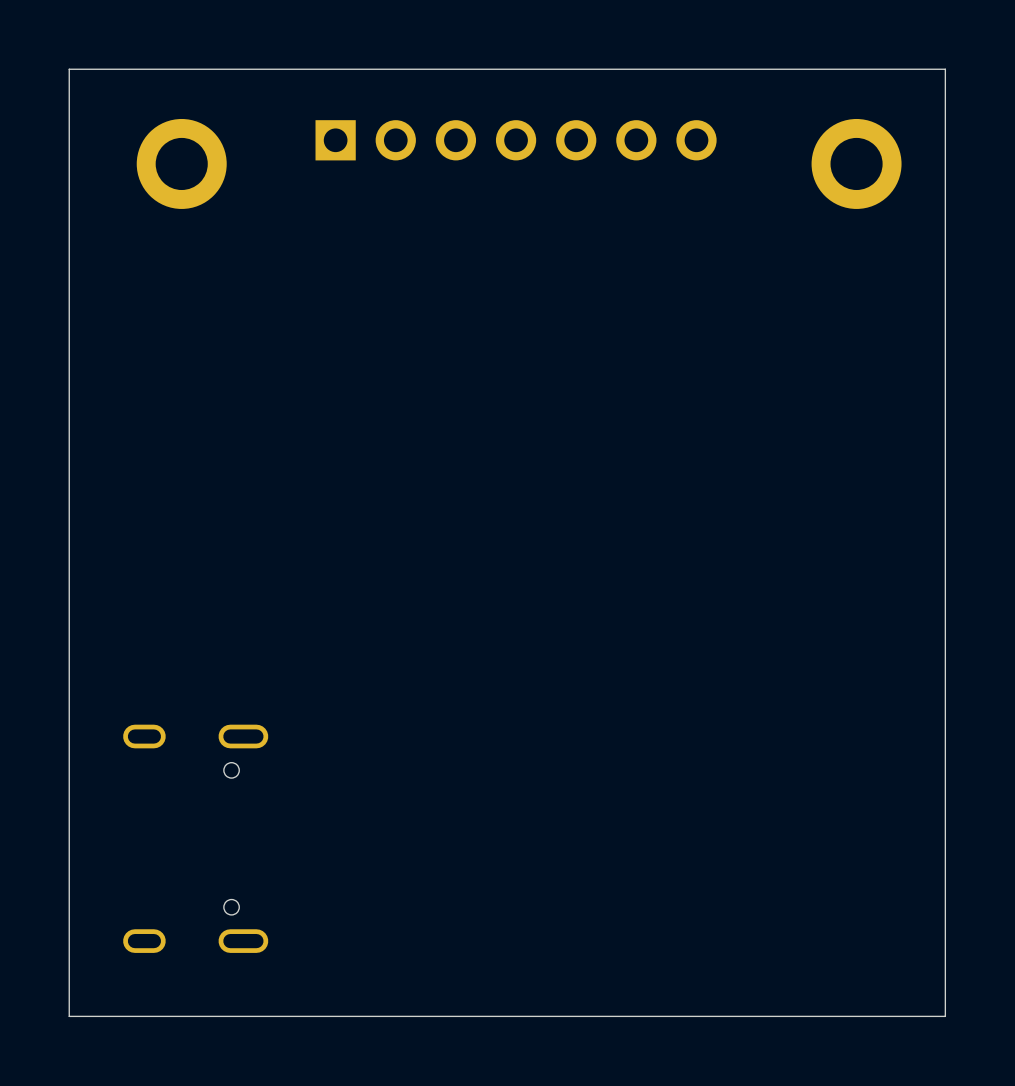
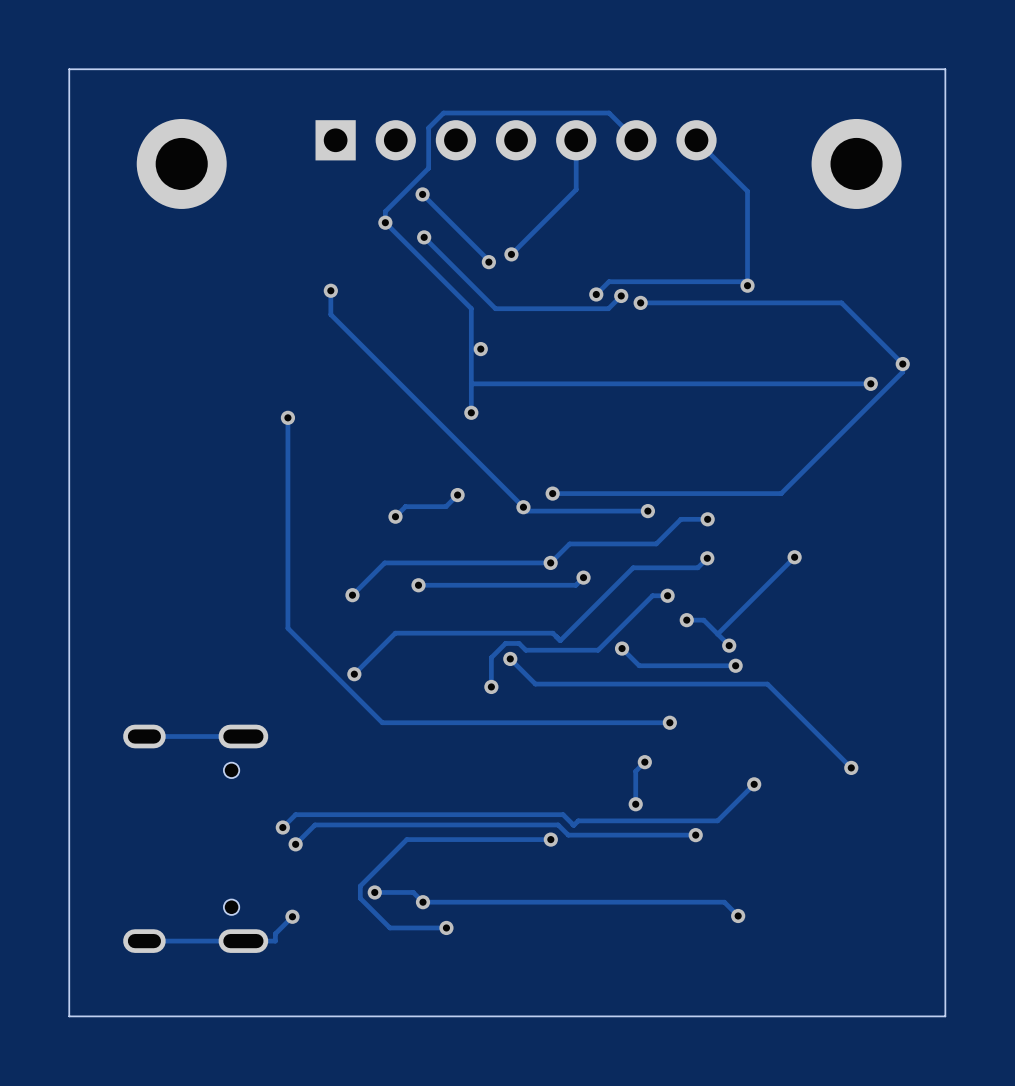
track: none -> (576, 140) (576, 189) (511, 254)
track: none -> (636, 140) (609, 113) (443, 113) (428, 127) (428, 168) (385, 211) (385, 222) (471, 308) (471, 412)
track: none -> (696, 140) (747, 191) (747, 285) (743, 281) (609, 281) (596, 294)
track: none -> (422, 194) (488, 262)
via: none -> (422, 194)
via: none -> (385, 222)
track: none -> (424, 237) (495, 308) (608, 308) (621, 295)
via: none -> (424, 237)
via: none -> (511, 254)
via: none -> (488, 262)
via: none -> (747, 285)
track: none -> (330, 290) (330, 314) (527, 511) (647, 511)
via: none -> (330, 290)
via: none -> (596, 294)
via: none -> (621, 295)
track: none -> (640, 302) (841, 302) (902, 364) (902, 372) (781, 493) (552, 493)
via: none -> (640, 302)
via: none -> (480, 349)
via: none -> (902, 364)
track: none -> (870, 383) (471, 383)
via: none -> (870, 383)
via: none -> (471, 412)
track: none -> (287, 417) (287, 628) (382, 722) (669, 722)
via: none -> (287, 417)
via: none -> (552, 493)
track: none -> (457, 495) (446, 506) (405, 506) (395, 516)
via: none -> (457, 495)
via: none -> (523, 507)
via: none -> (647, 511)
via: none -> (395, 516)
track: none -> (707, 519) (680, 519) (656, 543) (569, 543) (550, 562) (384, 562) (352, 595)
via: none -> (707, 519)
track: none -> (794, 557) (717, 634)
via: none -> (794, 557)
track: none -> (707, 558) (697, 567) (633, 567) (560, 640) (552, 633) (395, 633) (354, 674)
via: none -> (707, 558)
via: none -> (550, 562)
track: none -> (583, 577) (575, 585) (418, 585)
via: none -> (583, 577)
via: none -> (418, 585)
via: none -> (352, 595)
track: none -> (667, 595) (652, 595) (598, 650) (525, 650) (519, 643) (505, 643) (491, 657) (491, 686)
via: none -> (667, 595)
track: none -> (686, 620) (703, 620) (729, 645)
via: none -> (686, 620)
via: none -> (729, 645)
track: none -> (622, 648) (639, 665) (735, 665)
via: none -> (622, 648)
track: none -> (510, 658) (535, 684) (767, 684) (851, 767)
via: none -> (510, 658)
via: none -> (735, 665)
via: none -> (354, 674)
via: none -> (491, 686)
via: none -> (669, 722)
track: none -> (243, 736) (144, 736)
track: none -> (644, 762) (635, 771) (635, 804)
via: none -> (644, 762)
via: none -> (851, 767)
track: none -> (754, 784) (717, 820) (578, 820) (573, 825) (563, 814) (295, 814) (282, 827)
via: none -> (754, 784)
via: none -> (635, 804)
via: none -> (282, 827)
track: none -> (695, 835) (568, 835) (558, 824) (315, 824) (295, 844)
via: none -> (695, 835)
track: none -> (550, 839) (406, 839) (360, 886) (360, 898) (389, 927) (446, 927)
via: none -> (550, 839)
via: none -> (295, 844)
track: none -> (374, 892) (413, 892) (422, 902) (724, 902) (738, 915)
via: none -> (374, 892)
via: none -> (422, 902)
via: none -> (738, 915)
track: none -> (292, 916) (275, 933) (275, 941) (144, 941)
via: none -> (292, 916)
via: none -> (446, 927)

